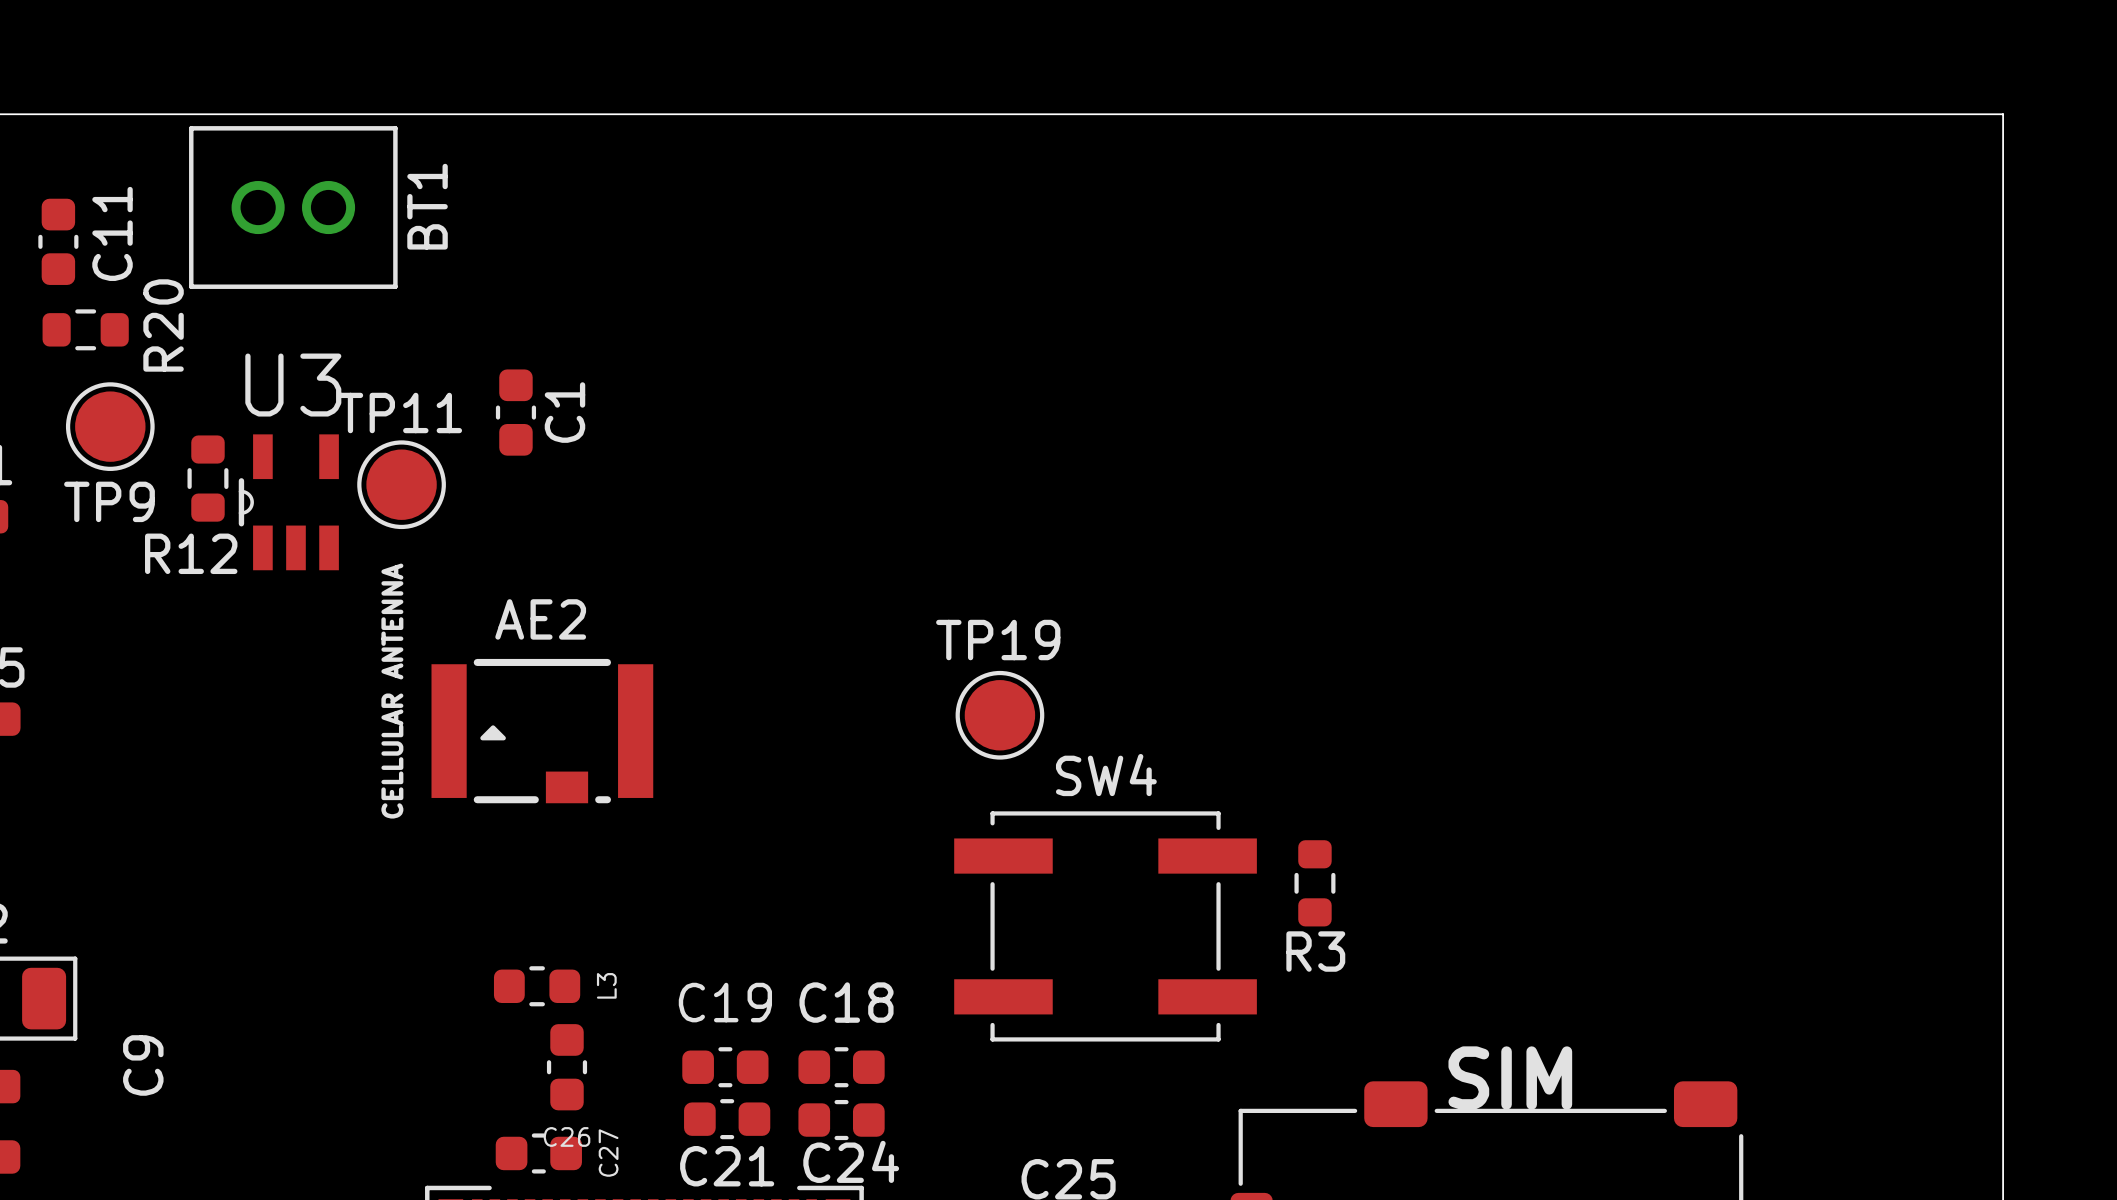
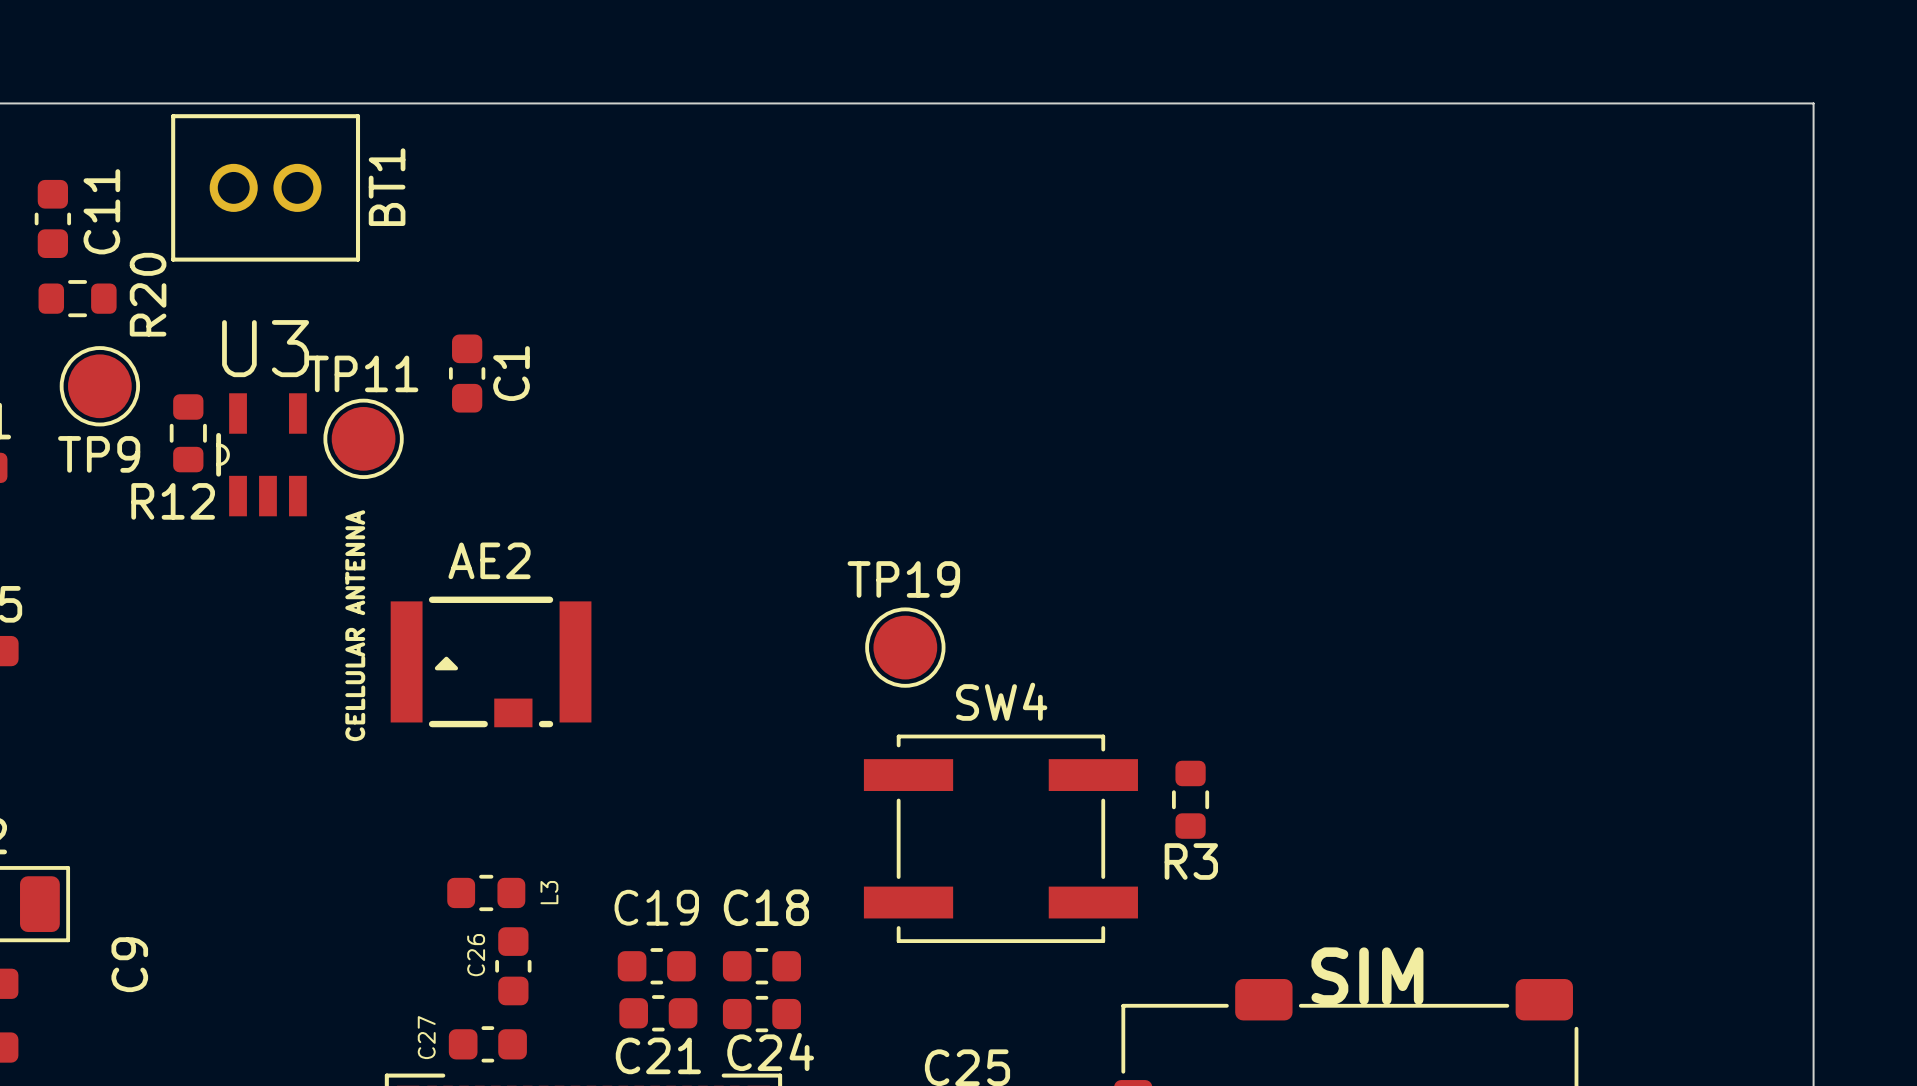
C26 name rotation: 0° (567, 1136) -> 90° counterclockwise (476, 955)
C26 name position: C26 (567, 1136) -> C26 (476, 955)
C27 name position: C27 (608, 1153) -> C27 (426, 1037)

